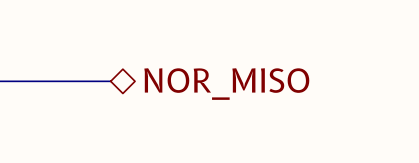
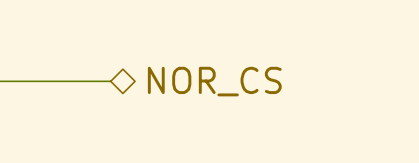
hierarchical label: NOR_MISO (226, 84) -> NOR_CS (214, 81)

